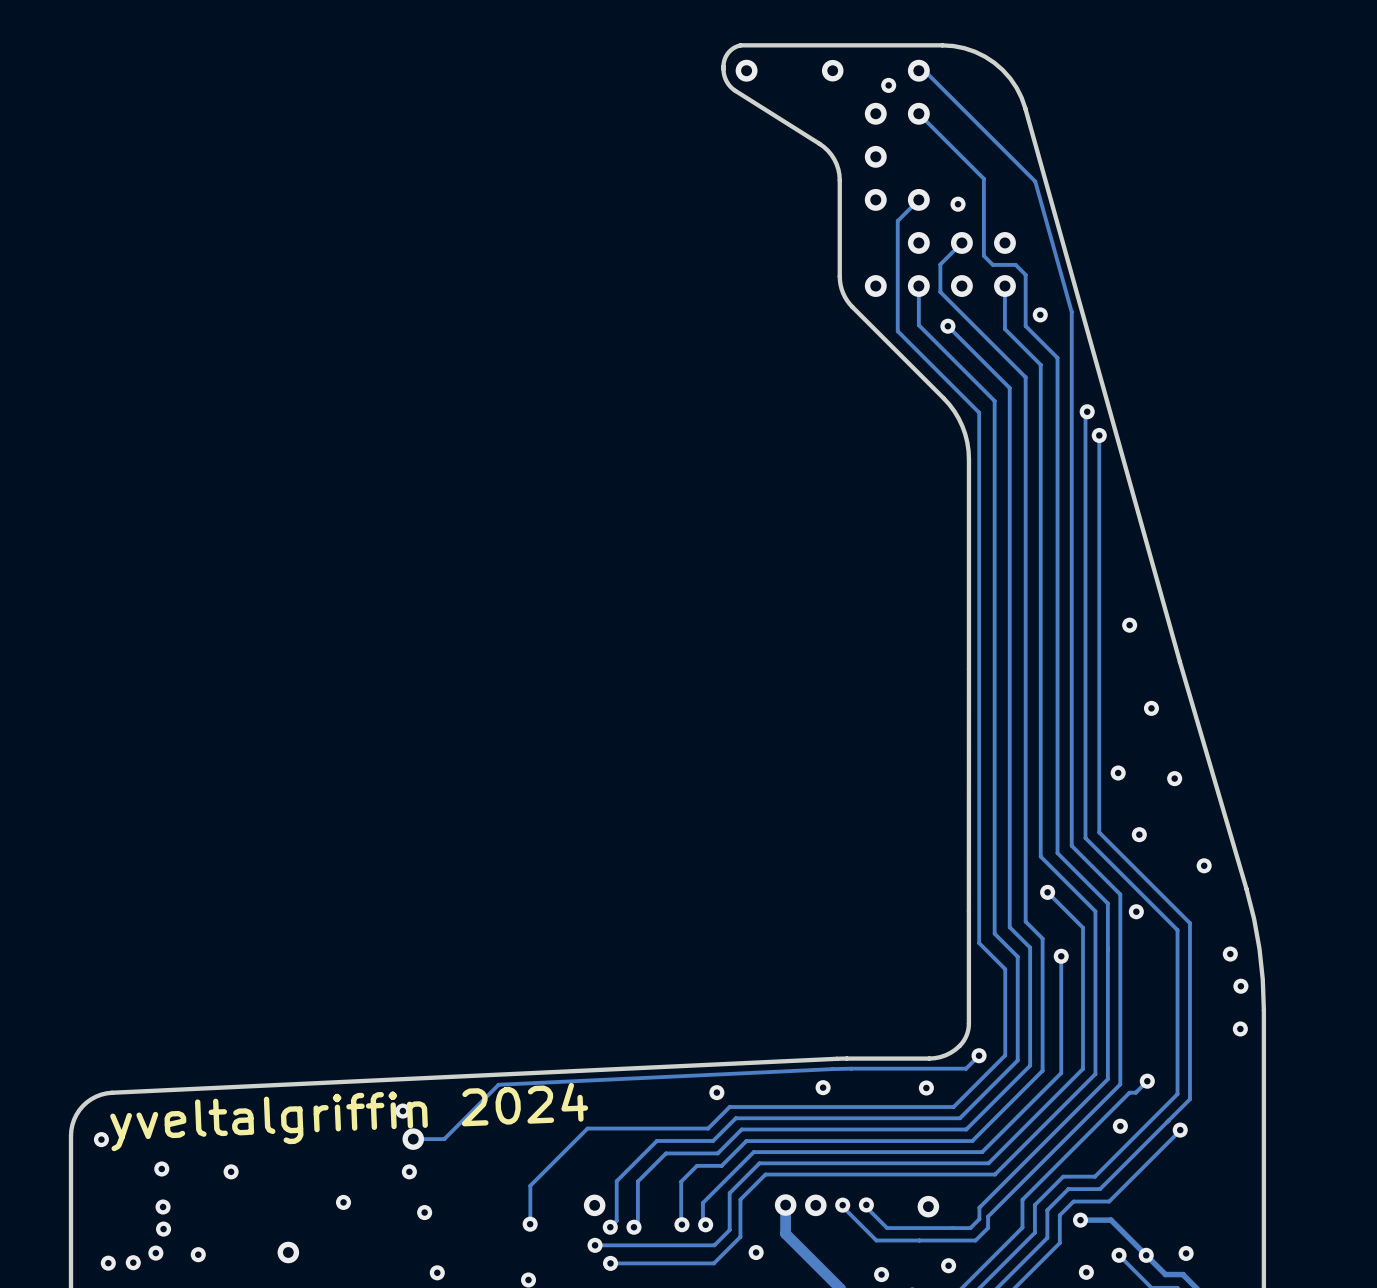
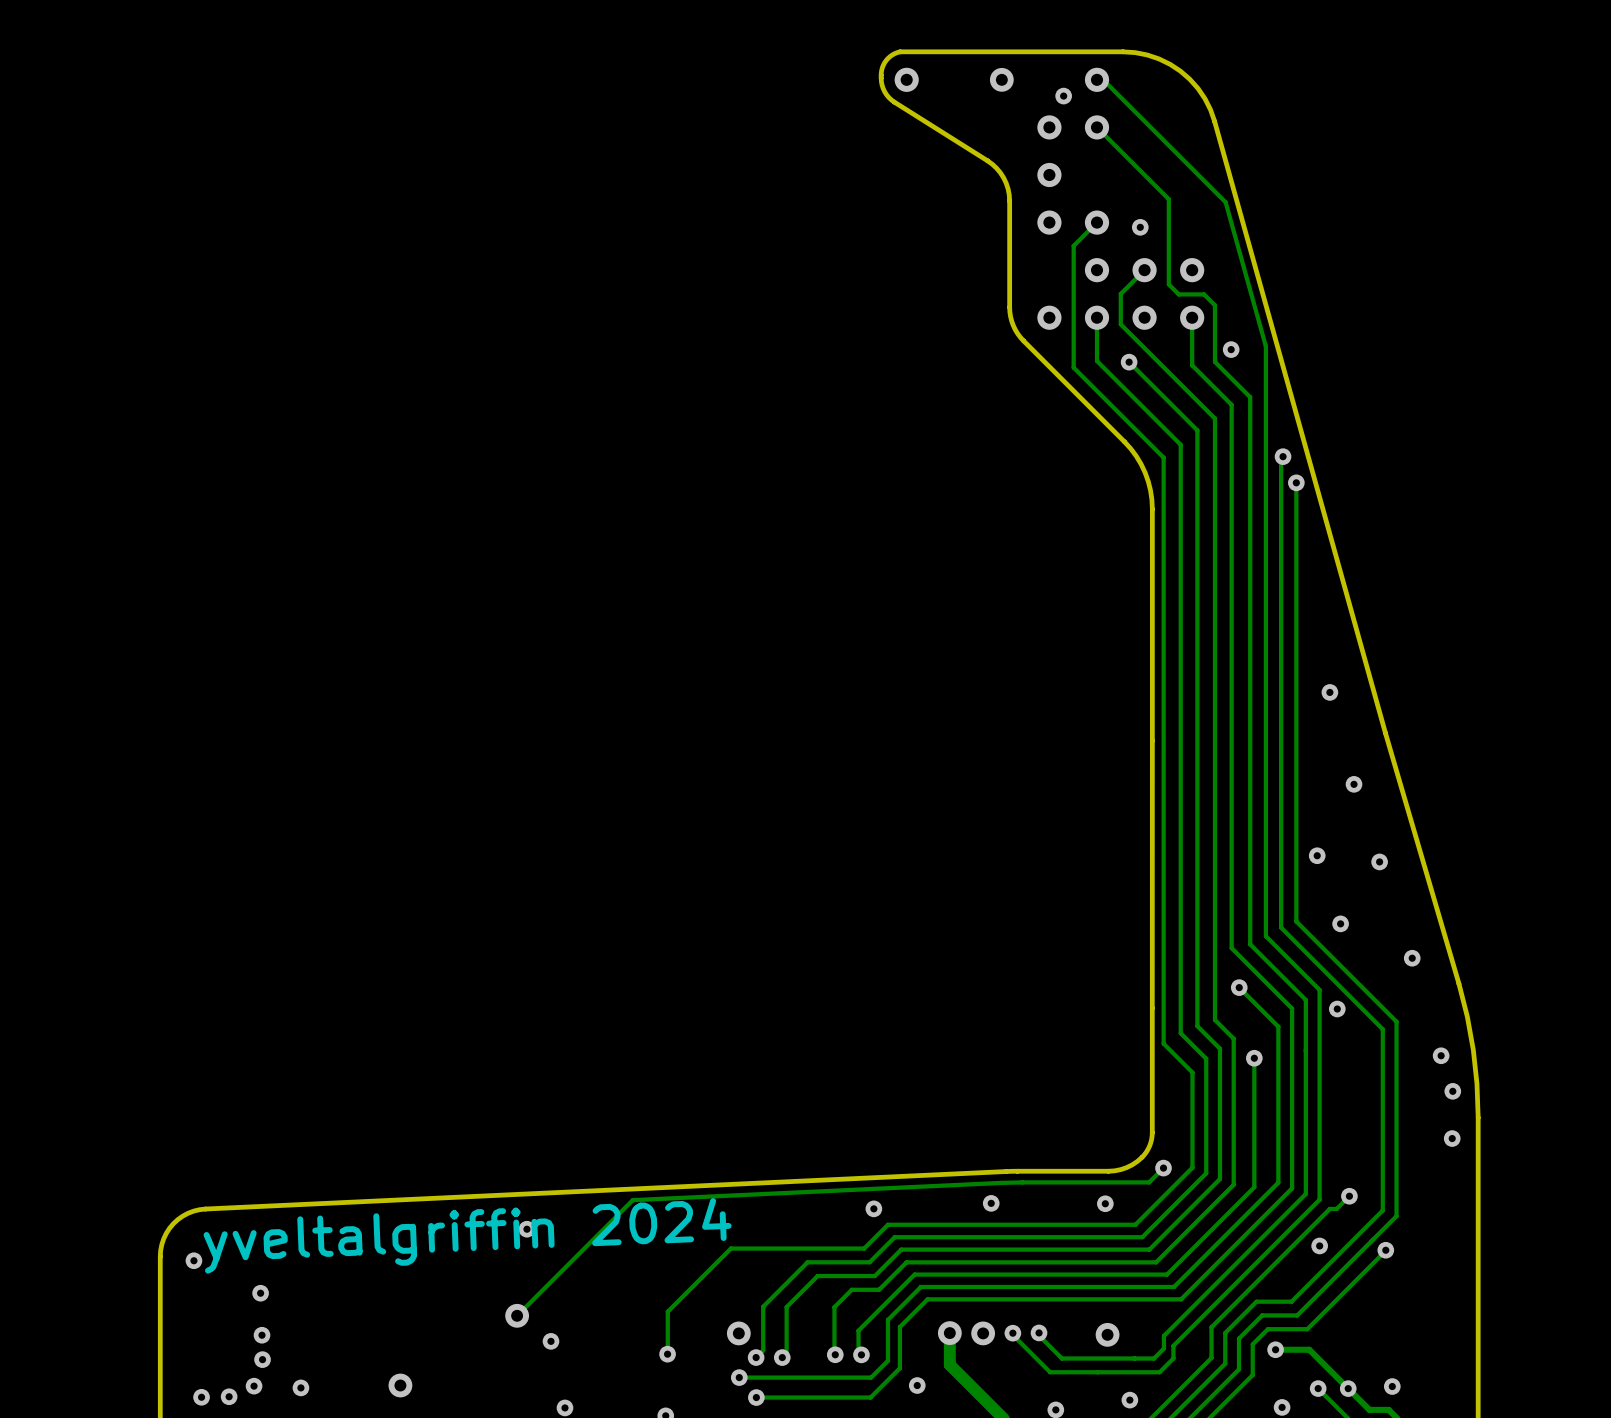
via position: (413, 1139) -> (517, 1315)
track: (444, 1139) (413, 1139) -> (572, 1260) (517, 1315)
via: (231, 1171) -> none
via: (409, 1171) -> none
via: (343, 1202) -> none

